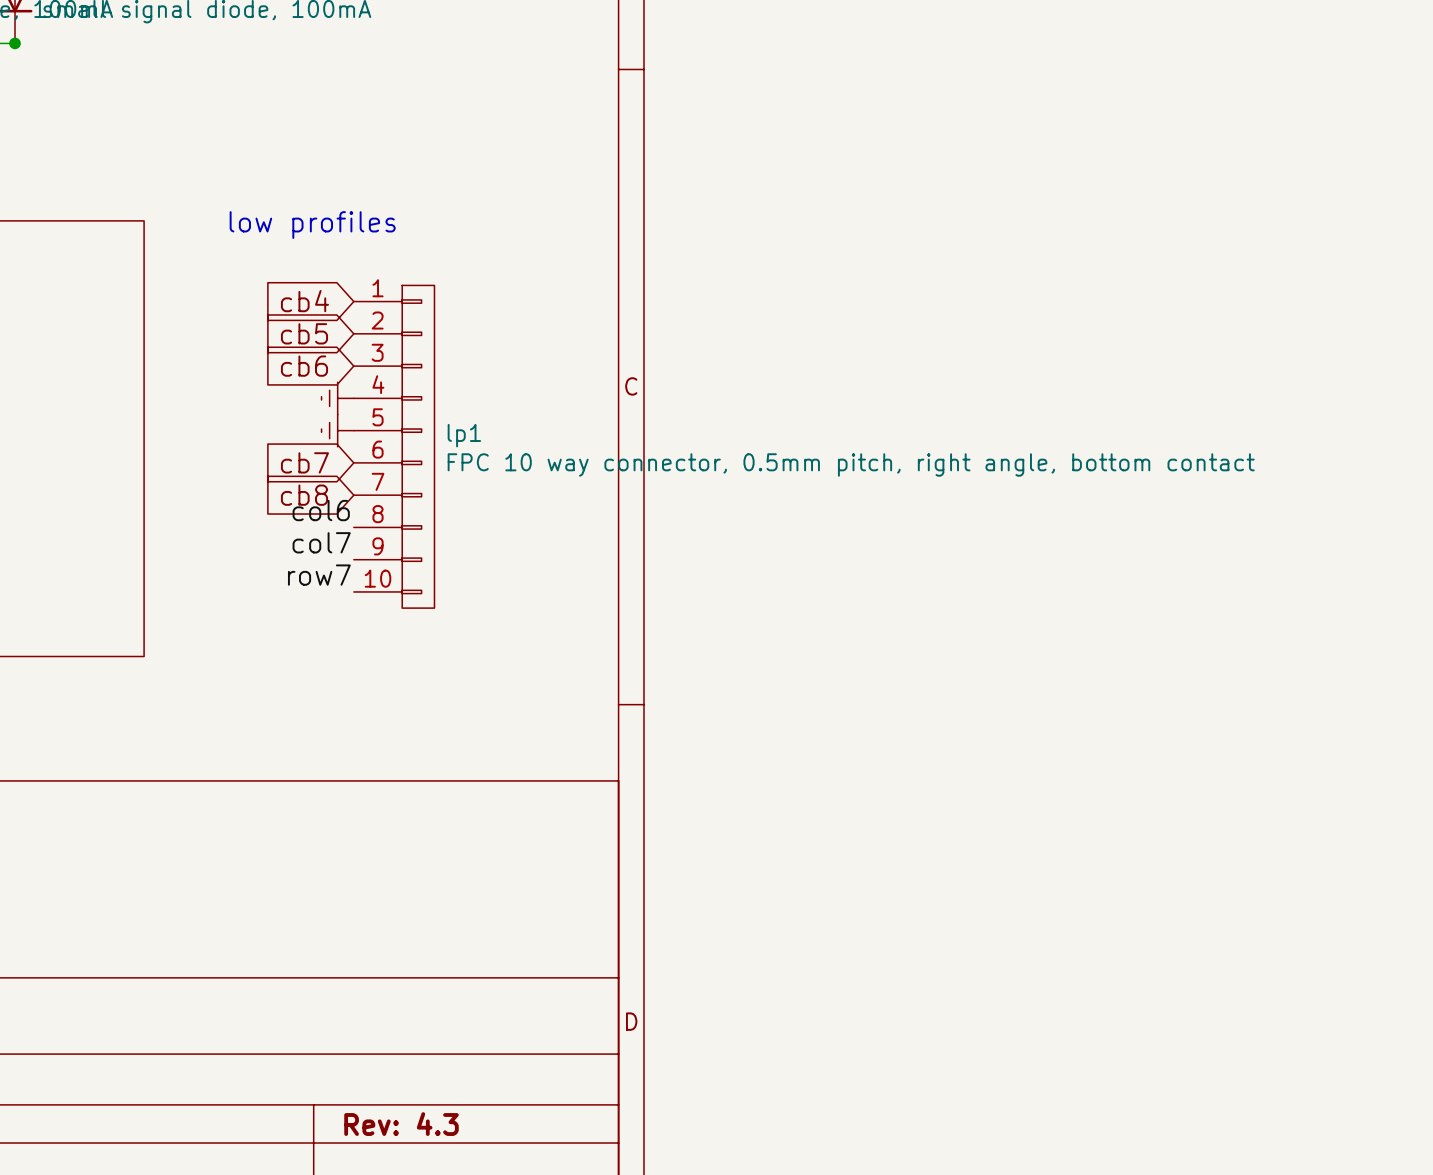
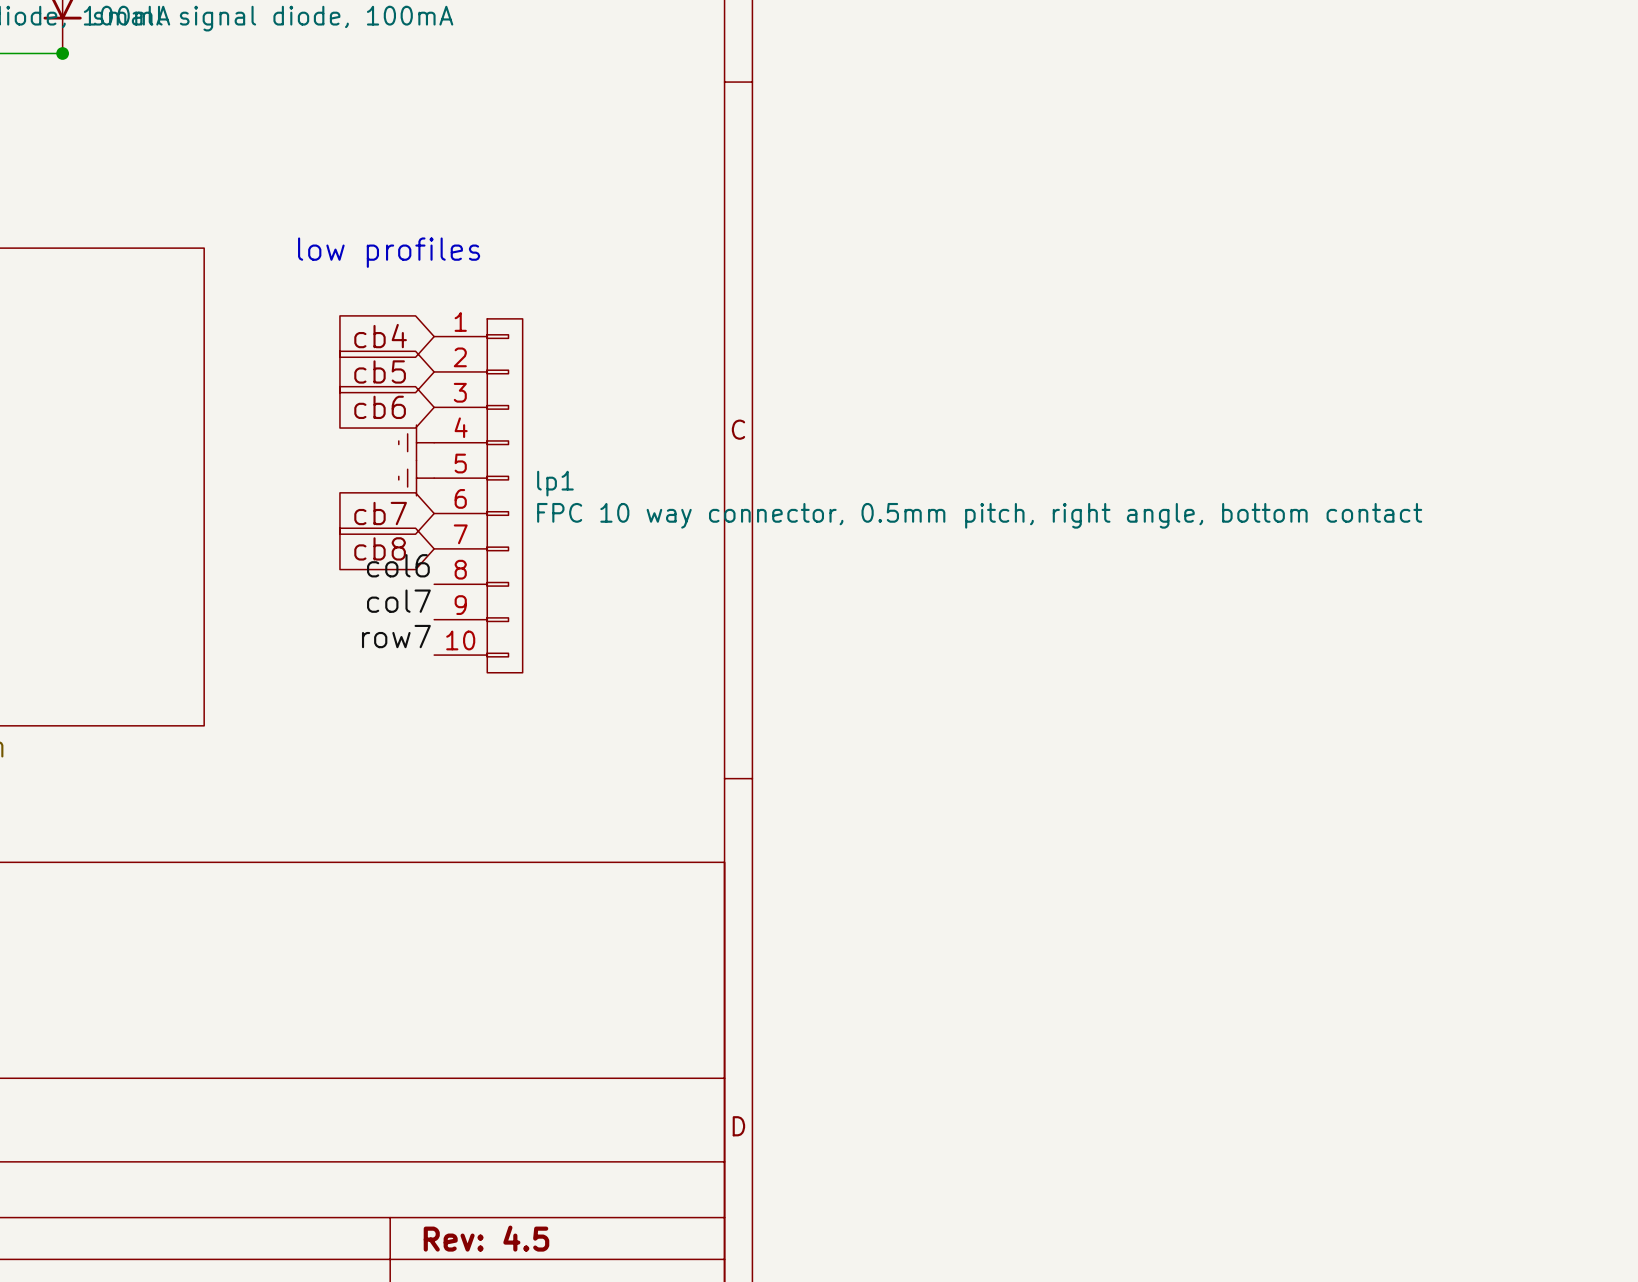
title block: Rev: 4.3 (401, 1124) -> Rev: 4.5 (486, 1238)

